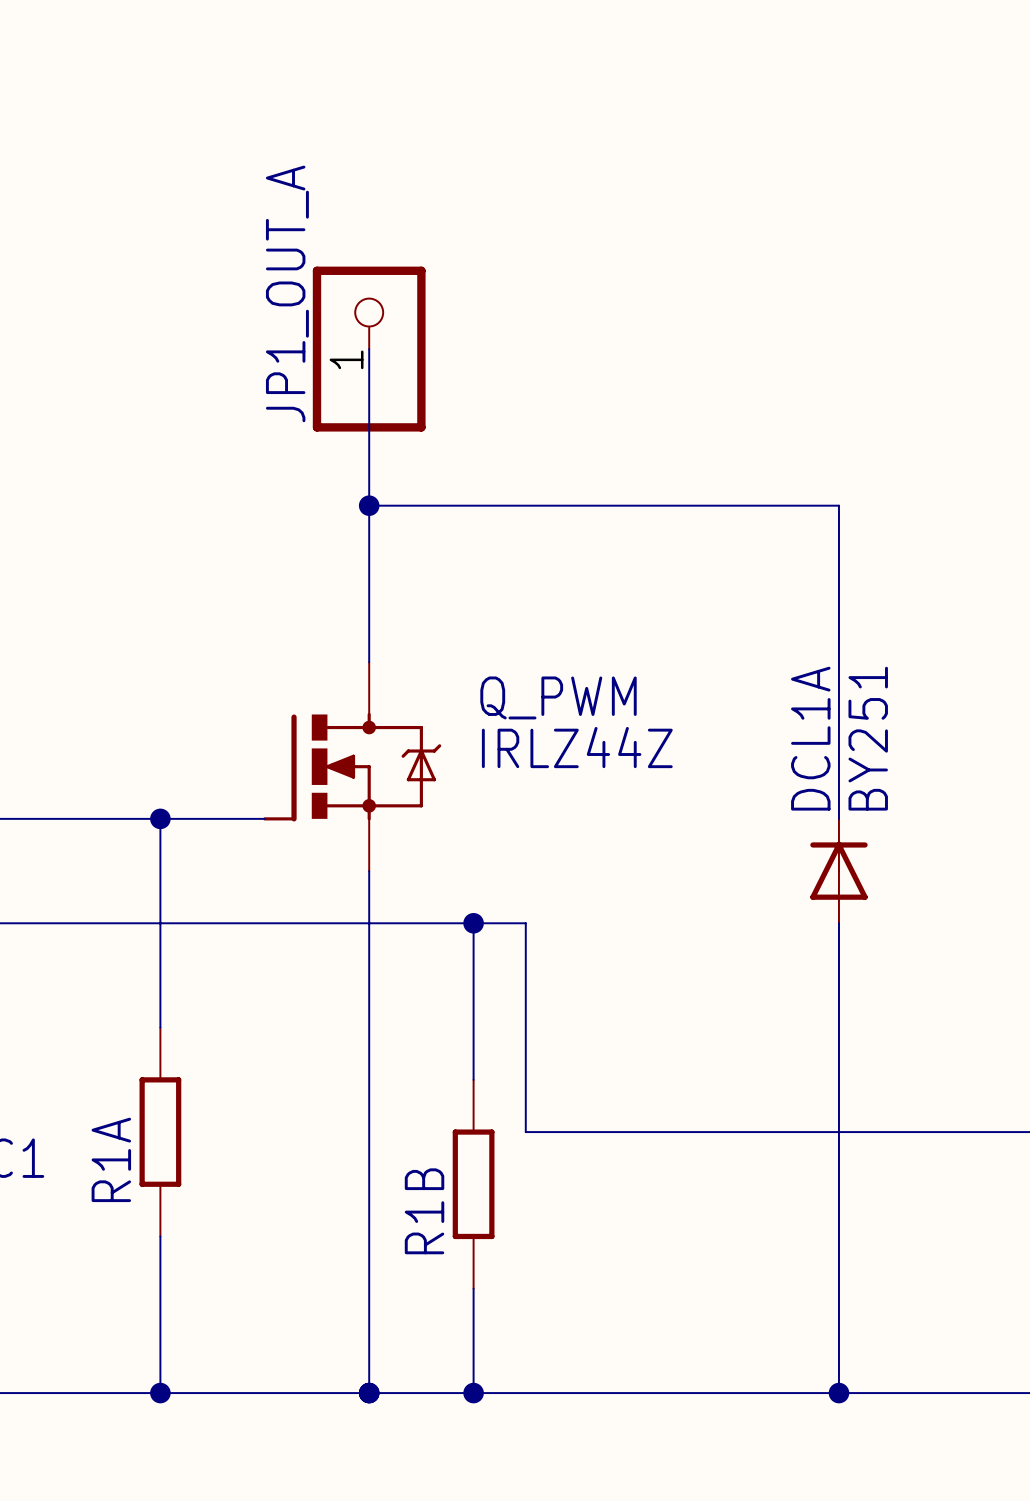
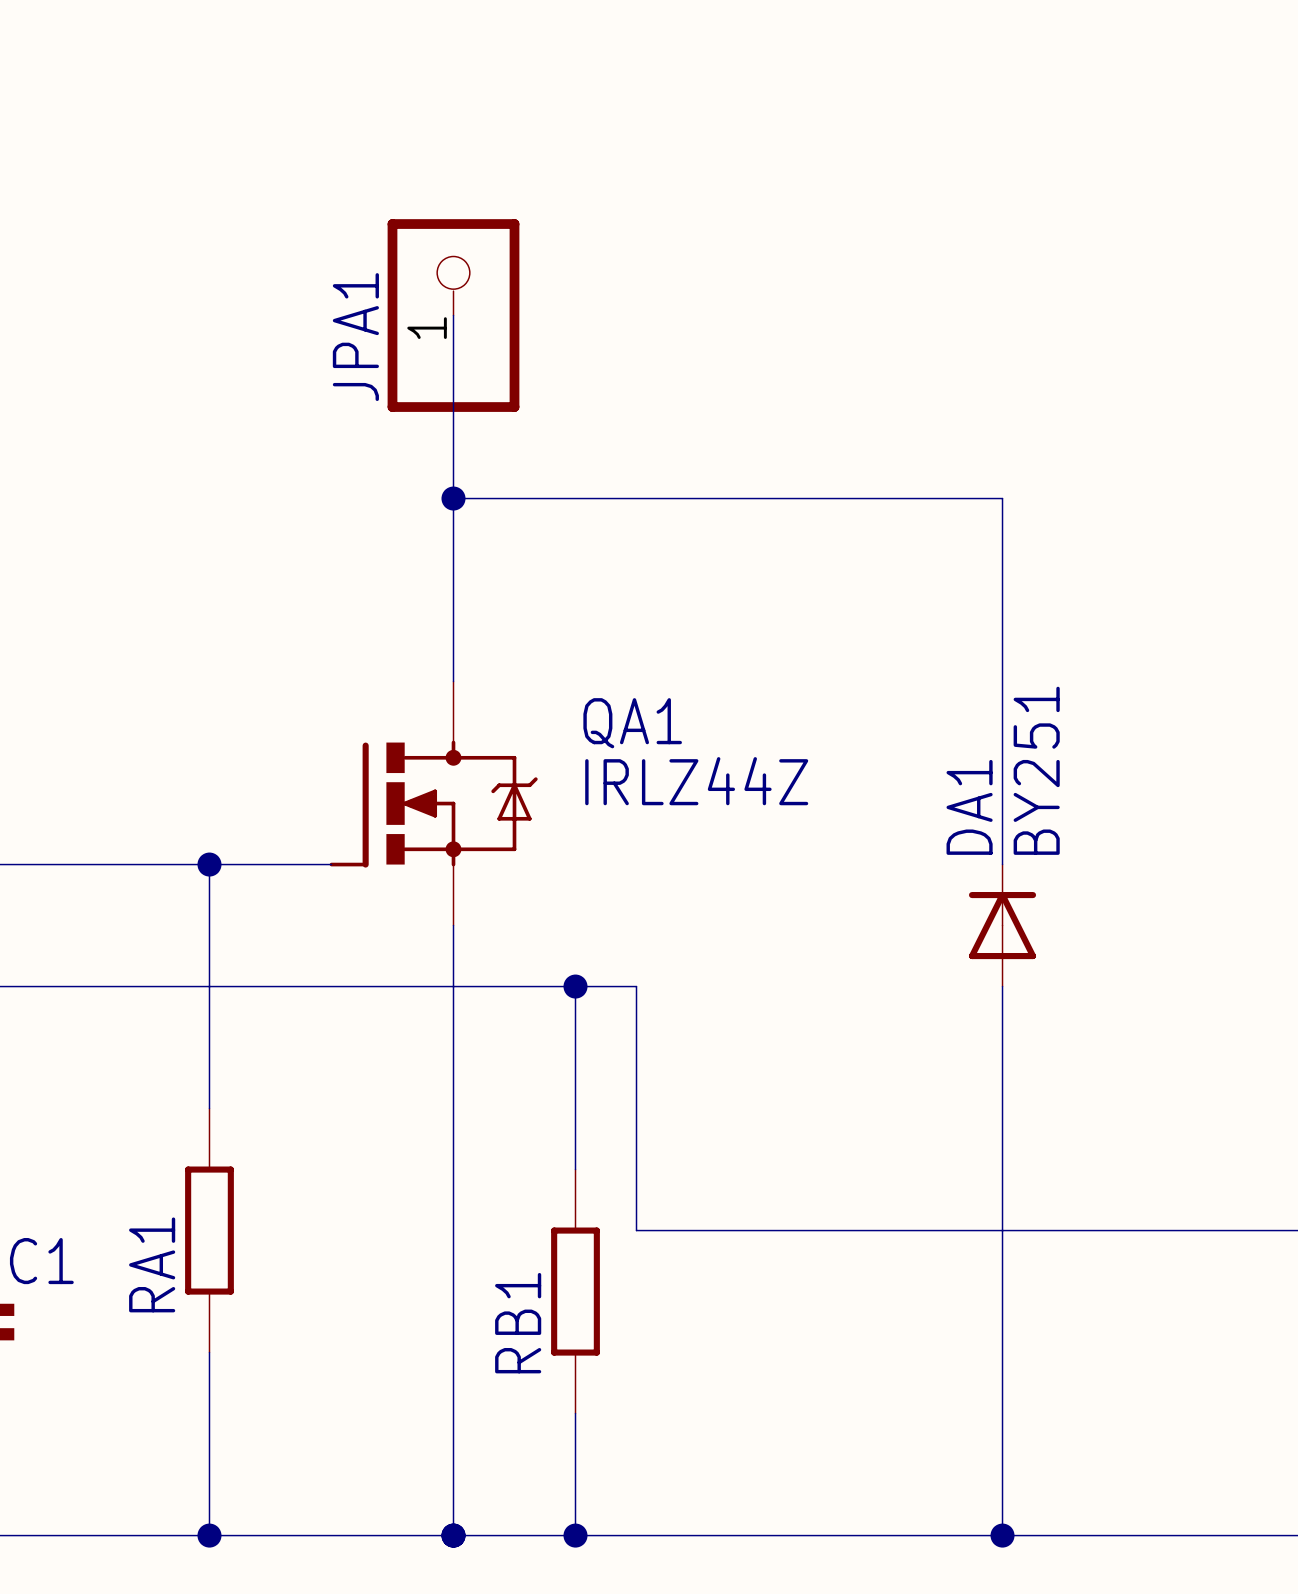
JP1_OUT_A name: JP1_OUT_A (287, 293) -> JPA1 (355, 337)
Q_PWM name: Q_PWM (558, 697) -> QA1 (632, 723)
DCL1A name: DCL1A (810, 738) -> DA1 (969, 807)
R1A name: R1A (111, 1159) -> RA1 (152, 1264)
R1B name: R1B (424, 1211) -> RB1 (518, 1323)

